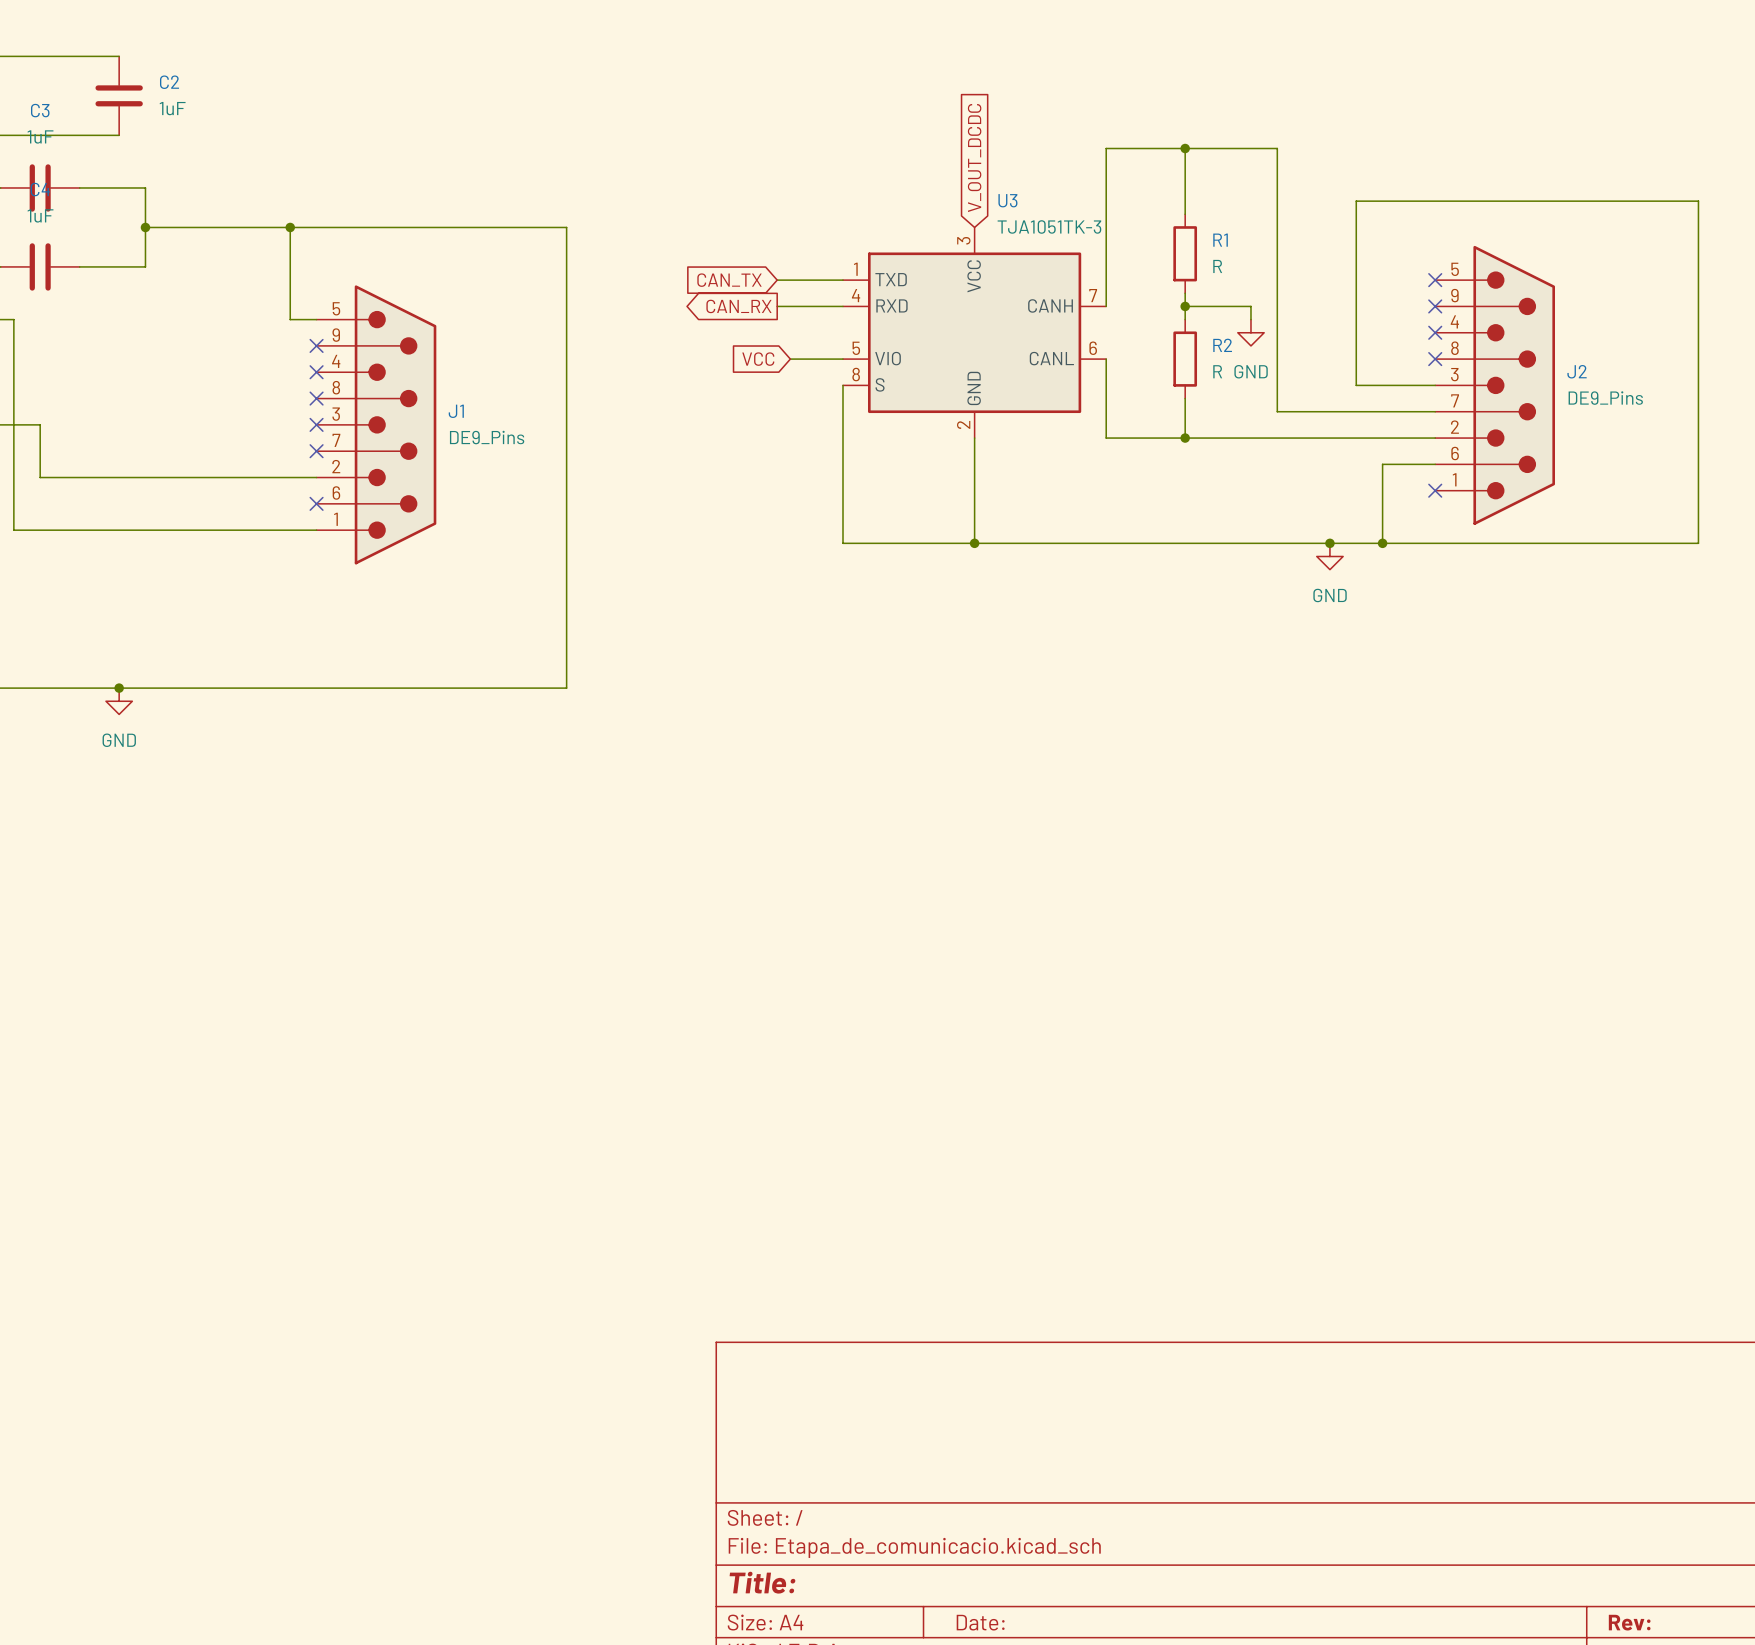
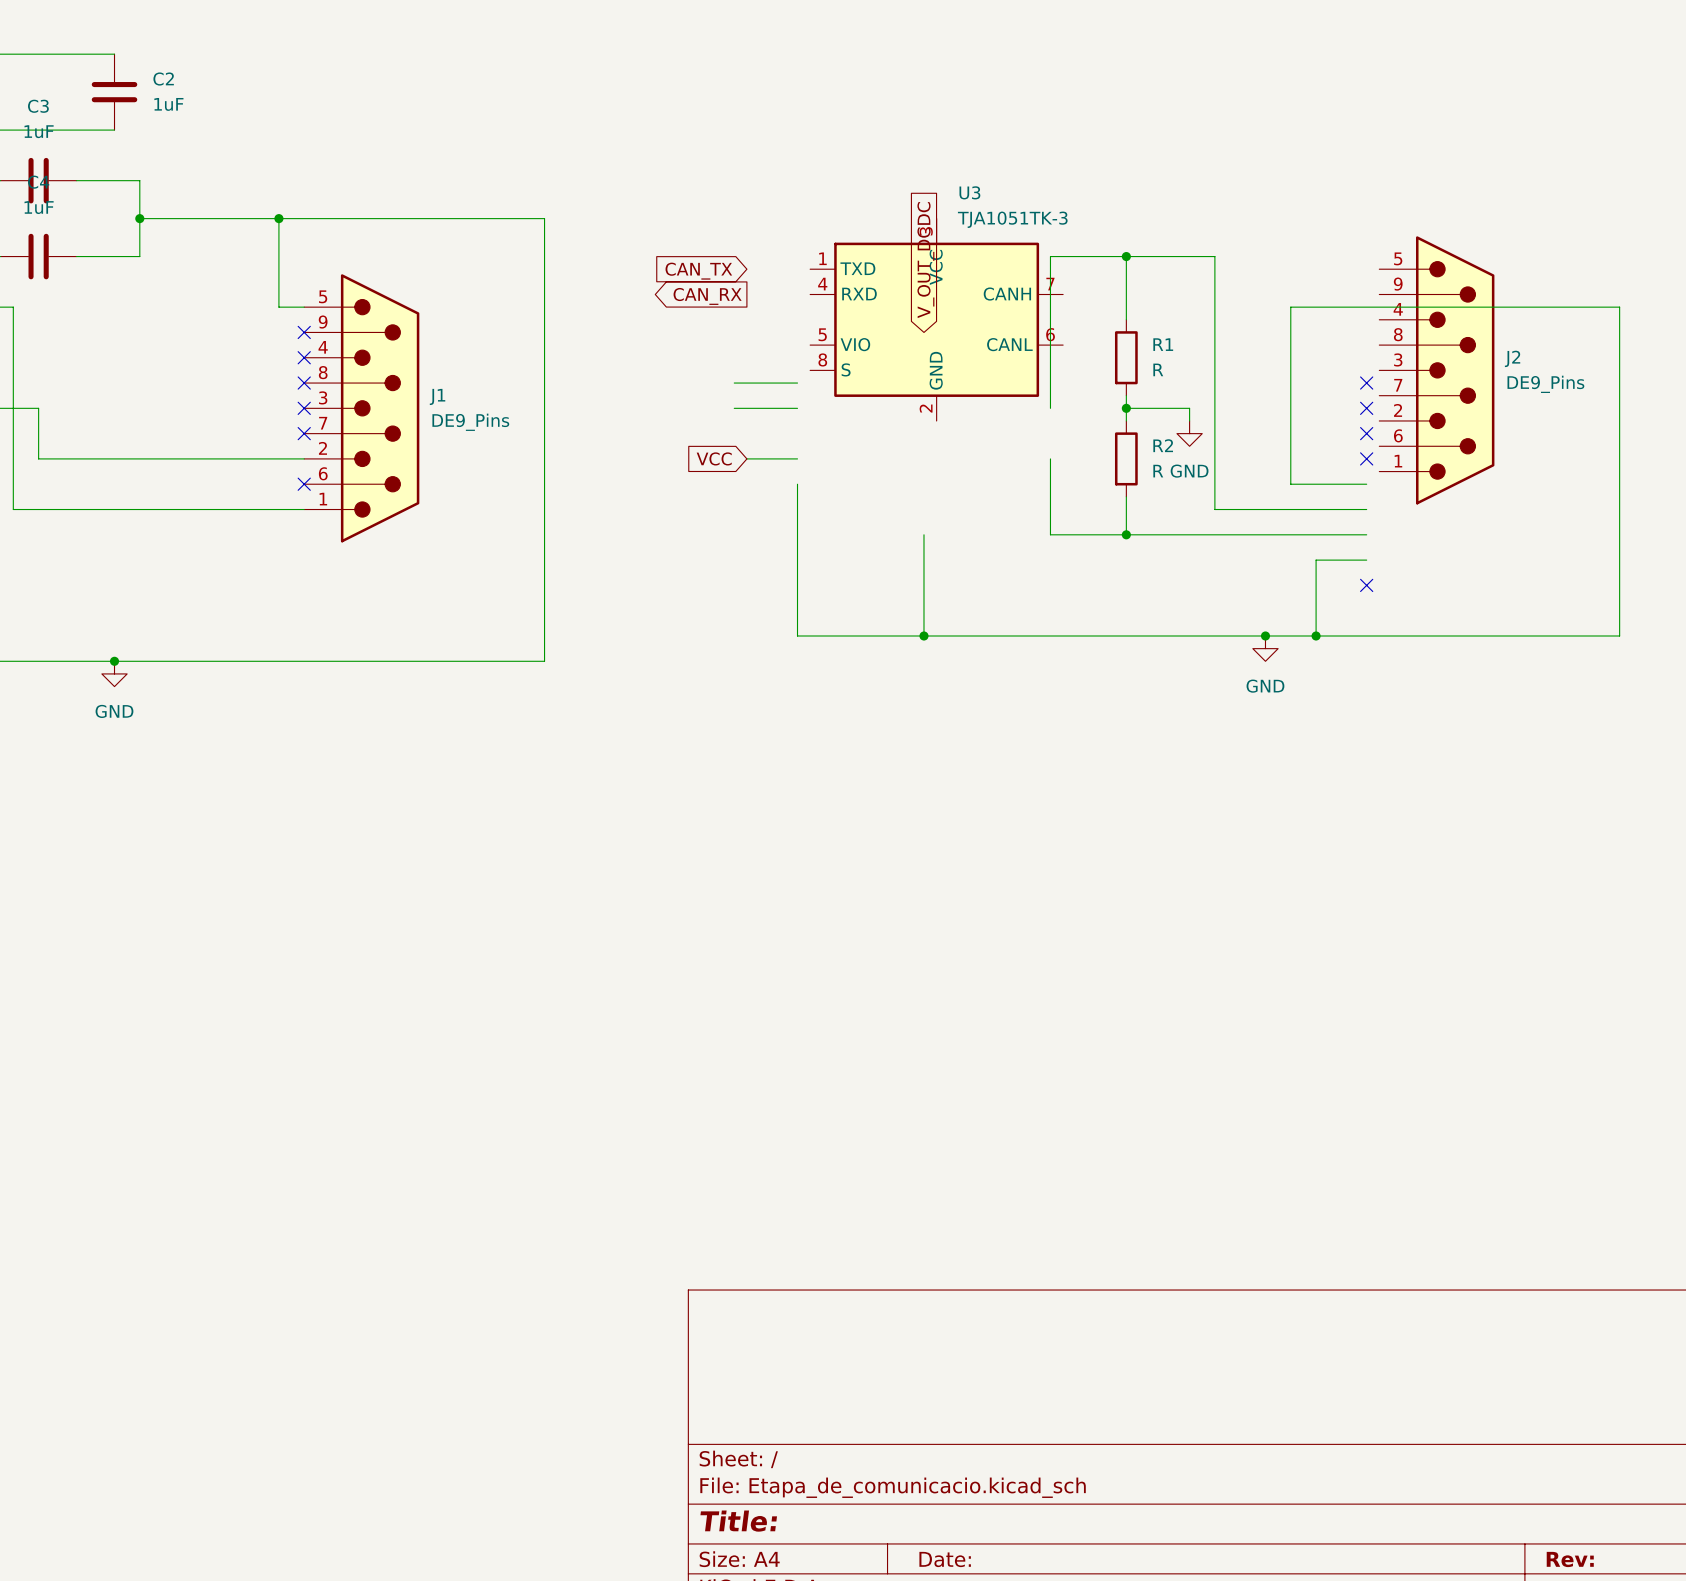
wire: (1185, 148) (1185, 214) -> (1126, 256) (1126, 319)
junction: (1185, 148) -> none
global label position: V_OUT_DCDC (974, 157) -> V_OUT_DCDC (925, 260)
R1 position: (1185, 253) -> (1126, 357)
wire: (777, 280) (843, 280) -> (734, 383) (797, 383)
no-connect mark: (1435, 280) -> none
wire: (1185, 293) (1185, 319) -> (1126, 395) (1126, 420)
wire: (777, 306) (843, 306) -> (734, 408) (797, 408)
wire: (1106, 306) (1106, 148) (1277, 148) (1277, 411) (1435, 411) -> (1050, 408) (1050, 256) (1214, 256) (1214, 509) (1366, 509)
wire: (1185, 306) (1250, 306) (1250, 319) -> (1126, 408) (1189, 408) (1189, 420)
junction position: (1185, 306) -> (1126, 256)
no-connect mark: (1435, 306) -> none
power symbol: GND (1250, 332) -> none
no-connect mark: (1435, 332) -> none
global label position: VCC (758, 359) -> VCC (714, 458)
wire: (790, 359) (843, 359) -> (746, 458) (797, 458)
wire: (1106, 359) (1106, 438) (1435, 438) -> (1050, 458) (1050, 534) (1366, 534)
R2 position: (1185, 359) -> (1126, 458)
no-connect mark: (1435, 359) -> none
wire: (843, 385) (843, 543) (1698, 543) (1698, 201) (1356, 201) (1356, 385) (1435, 385) -> (797, 484) (797, 636) (1619, 636) (1619, 307) (1290, 307) (1290, 484) (1366, 484)
wire: (1185, 398) (1185, 438) -> (1126, 496) (1126, 534)
no-connect mark: none -> (1366, 383)
no-connect mark: none -> (1366, 408)
wire: (974, 438) (974, 543) -> (923, 534) (923, 636)
junction position: (1185, 438) -> (1126, 408)
power symbol: none -> GND (1189, 433)
no-connect mark: none -> (1366, 433)
wire: (1435, 464) (1382, 464) (1382, 543) -> (1366, 560) (1316, 560) (1316, 636)
no-connect mark position: (1435, 490) -> (1366, 458)
junction: (974, 543) -> none
junction: (1329, 543) -> none
junction: (1382, 543) -> none
junction: none -> (1126, 534)
power symbol: GND (1329, 556) -> none
no-connect mark: none -> (1366, 585)
junction: none -> (923, 636)
junction: none -> (1265, 636)
junction: none -> (1316, 636)
power symbol: none -> GND (1265, 648)

